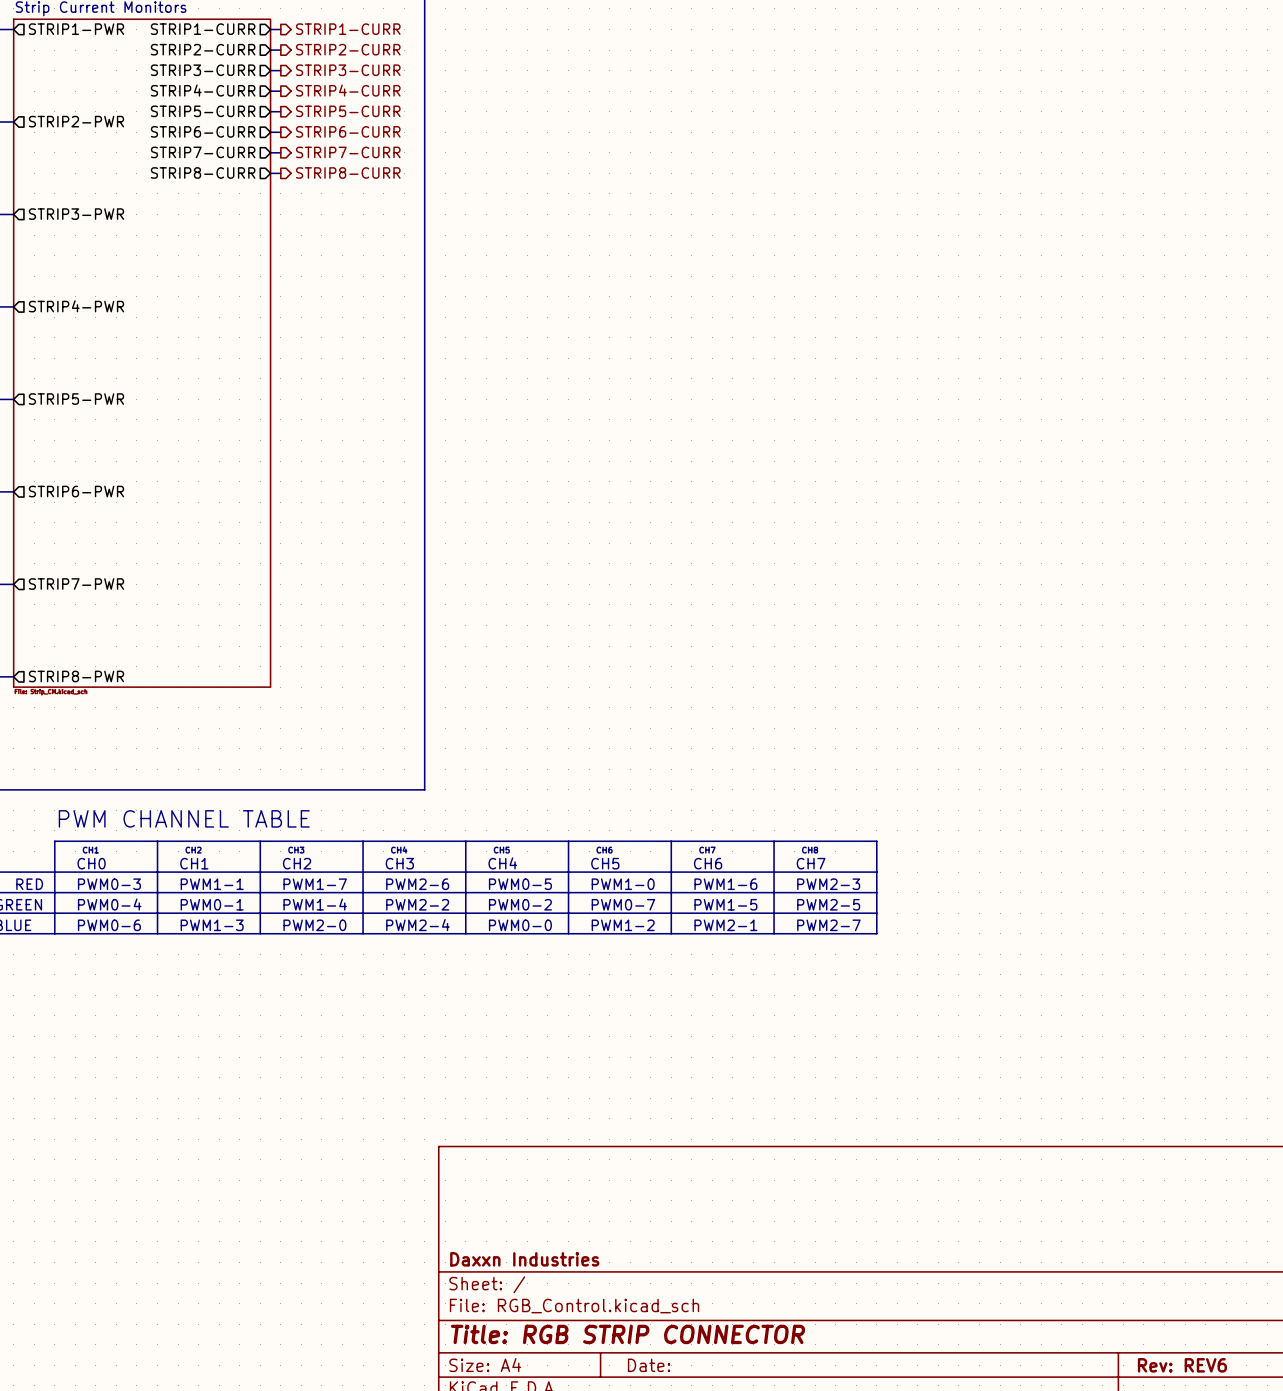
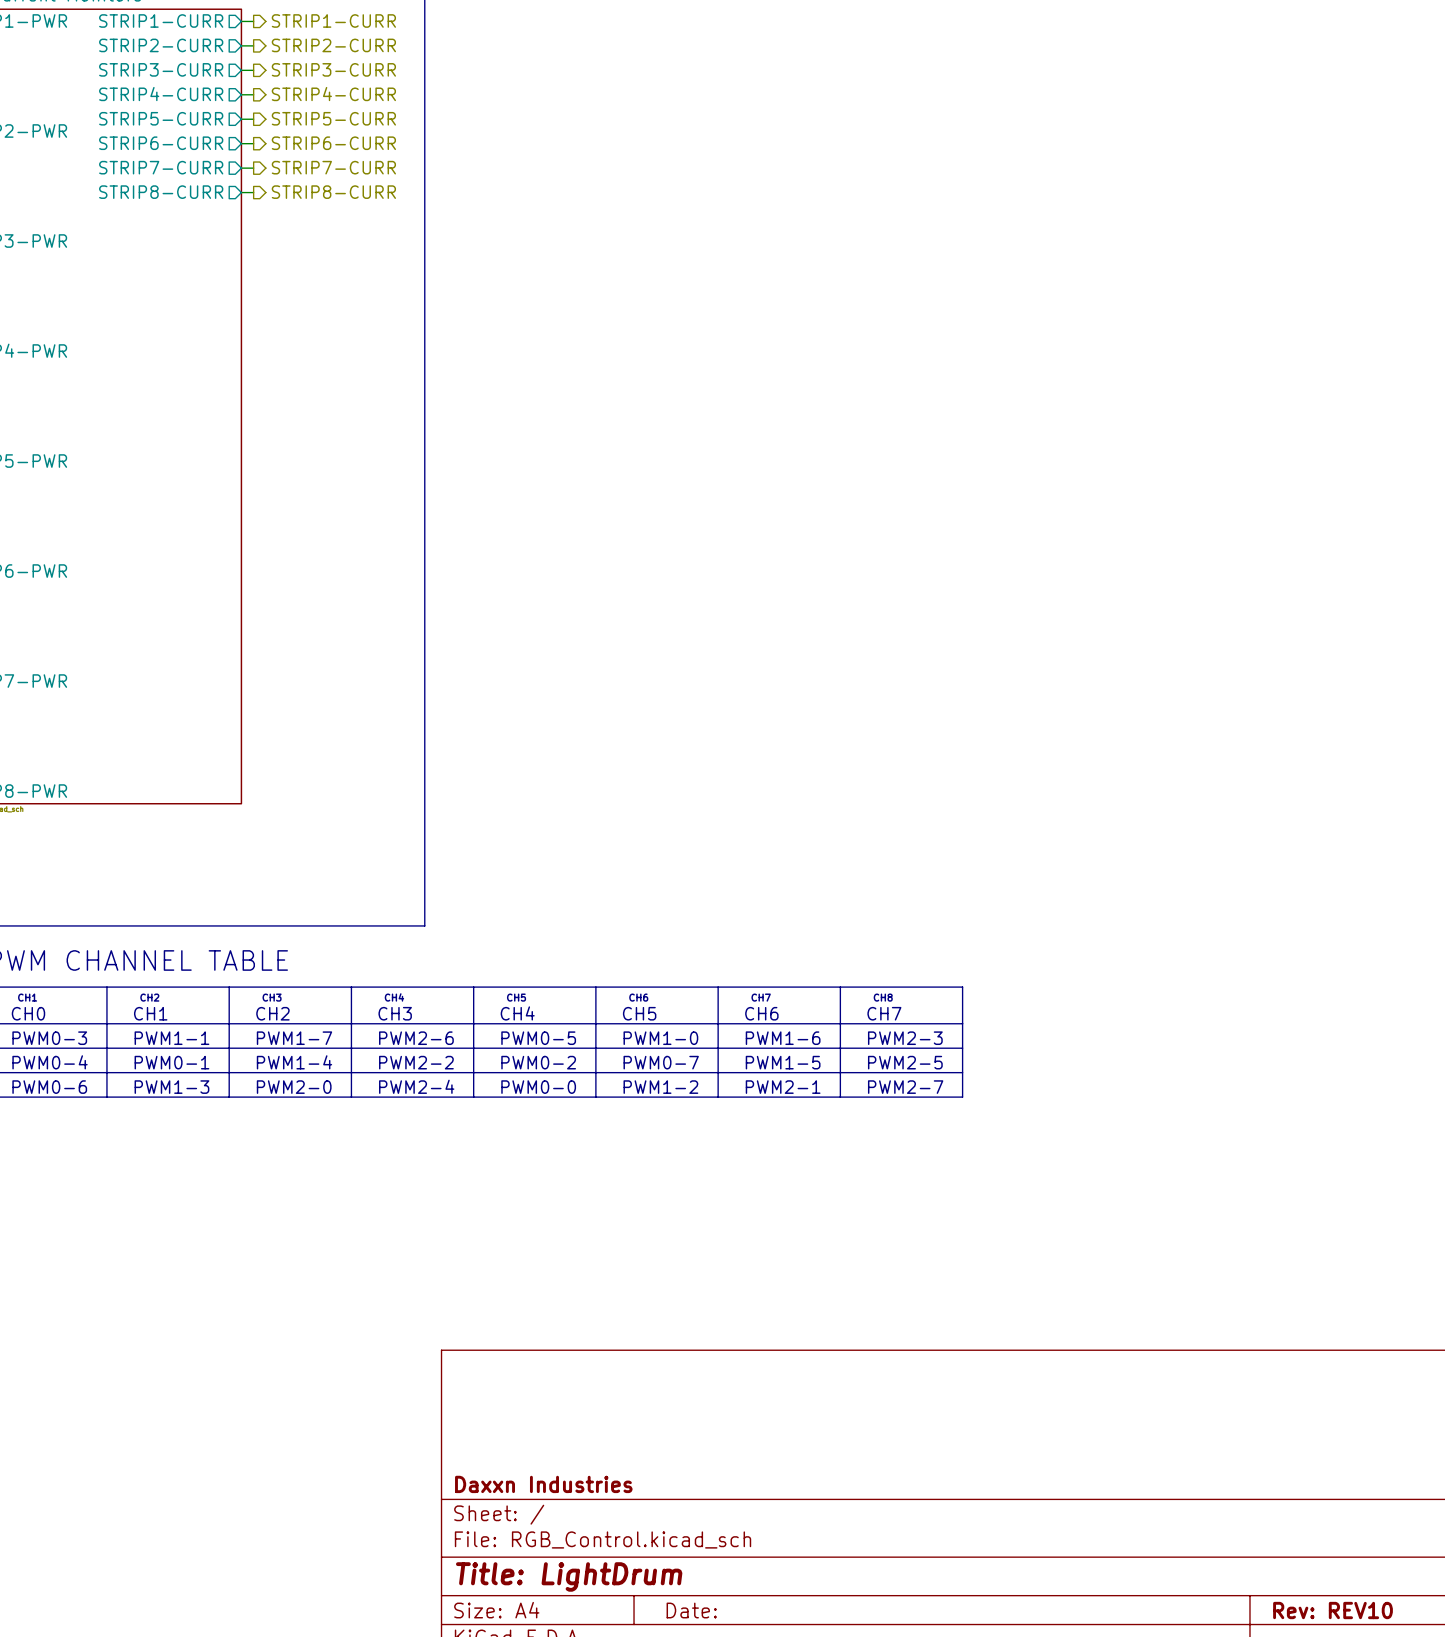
title block: Title: RGB STRIP CONNECTOR (628, 1334) -> Title: LightDrum (569, 1576)
title block: Rev: REV6 (1182, 1365) -> Rev: REV10 (1333, 1610)

